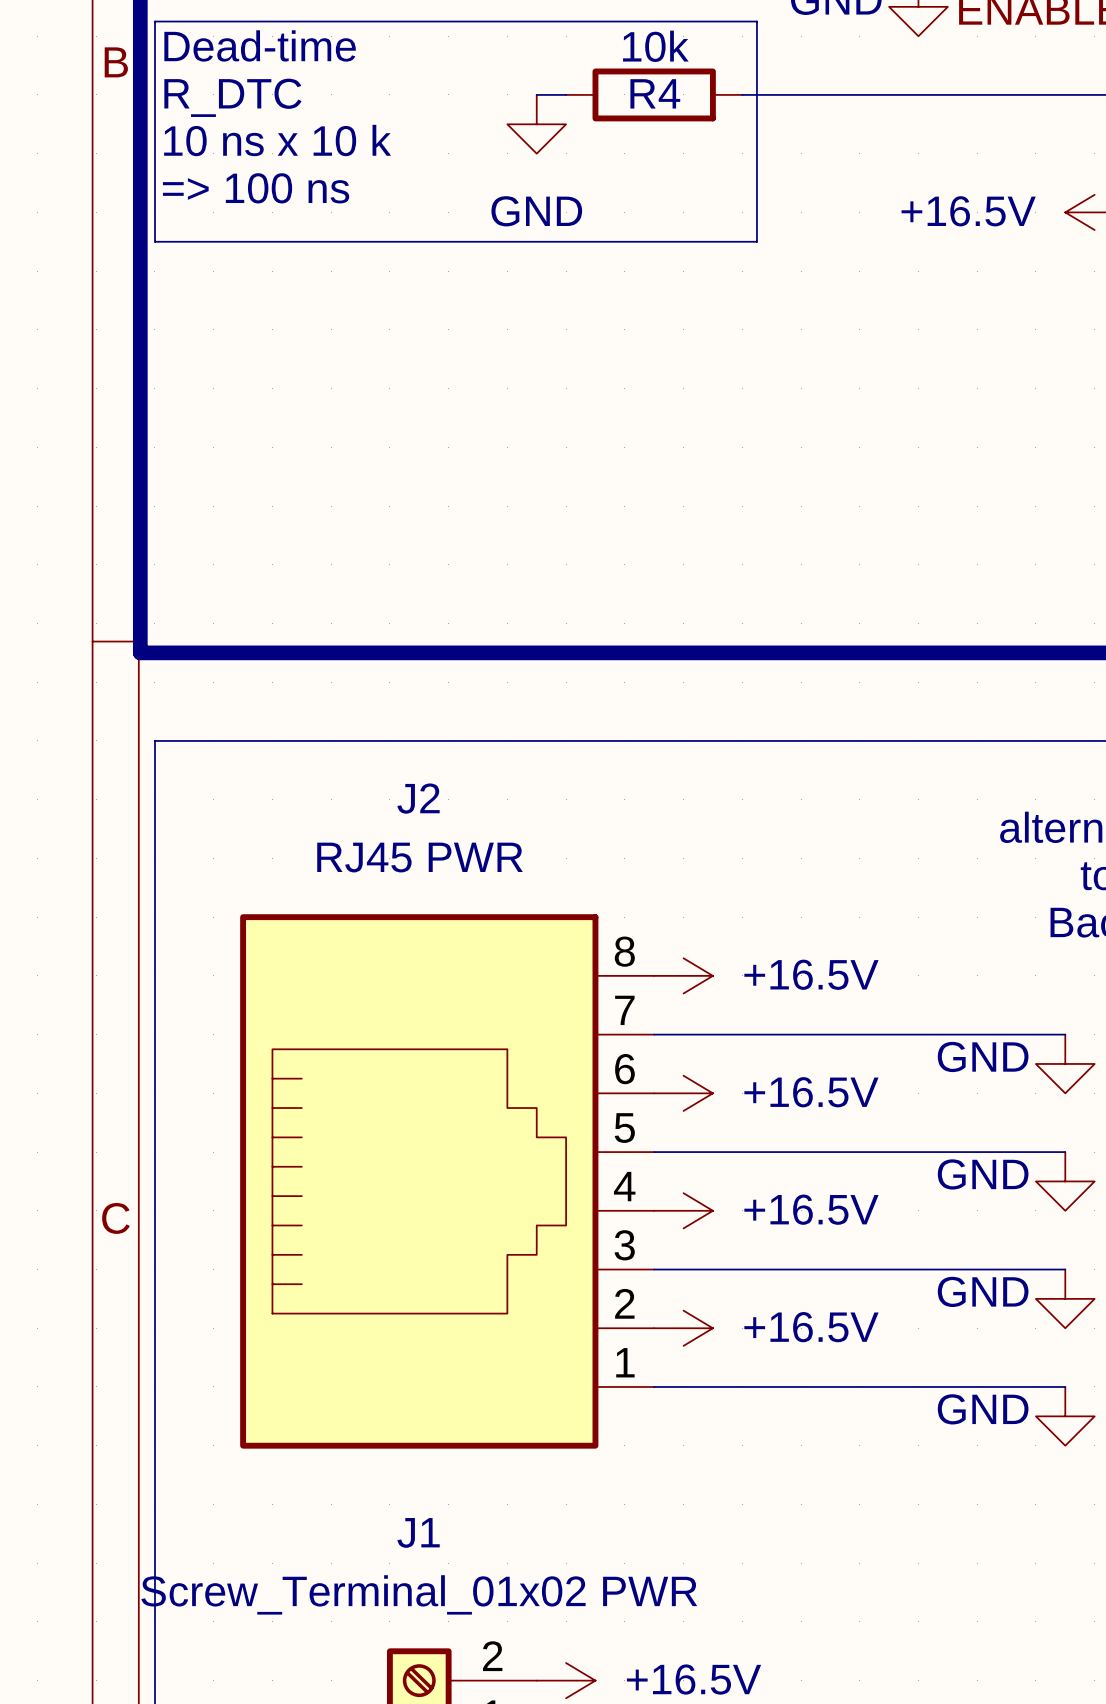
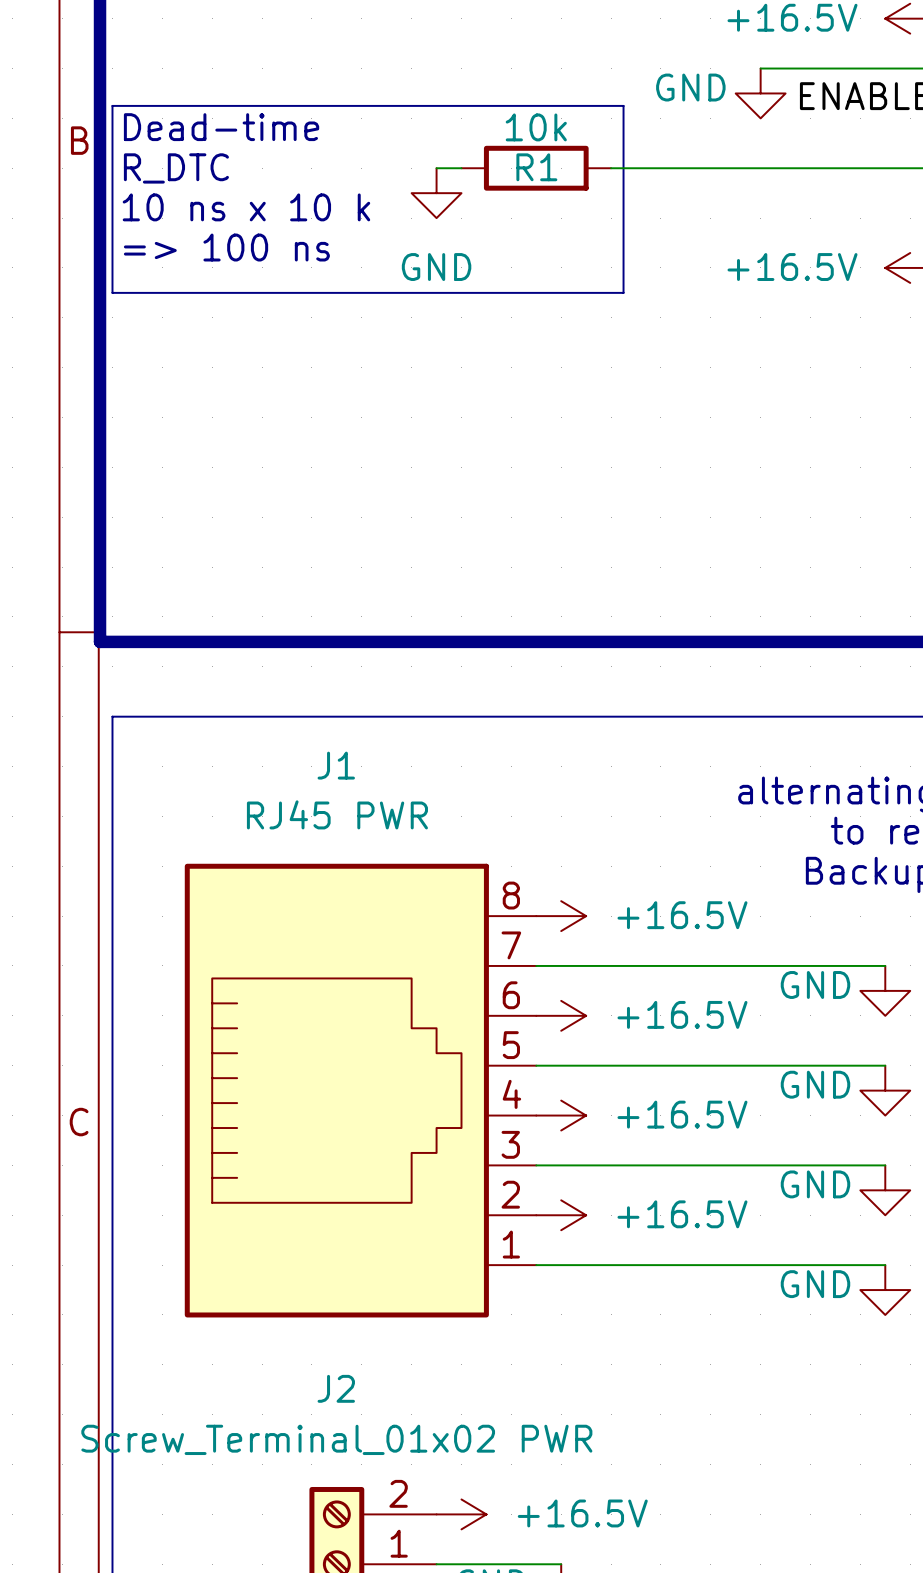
R4 name: R4 (655, 93) -> R1 (536, 167)
J2 name: J2 (418, 798) -> J1 (336, 765)
J1 name: J1 (418, 1532) -> J2 (336, 1388)

